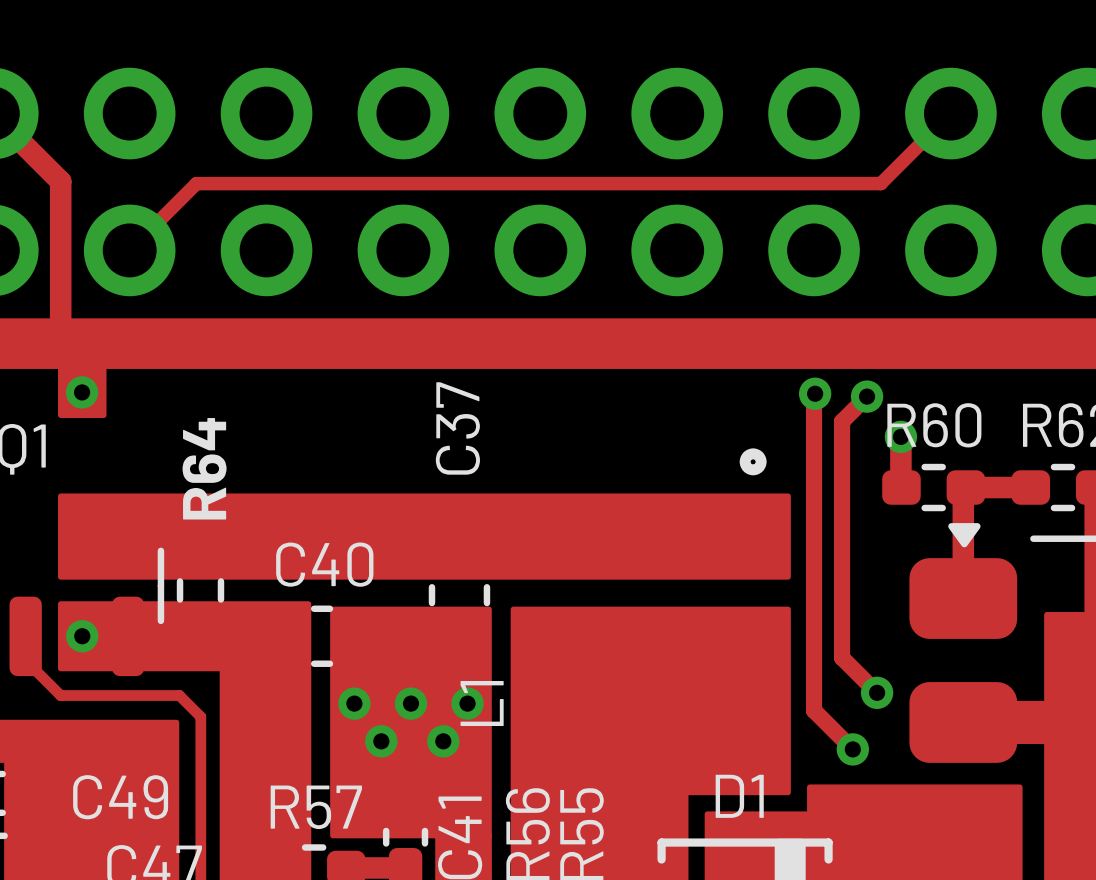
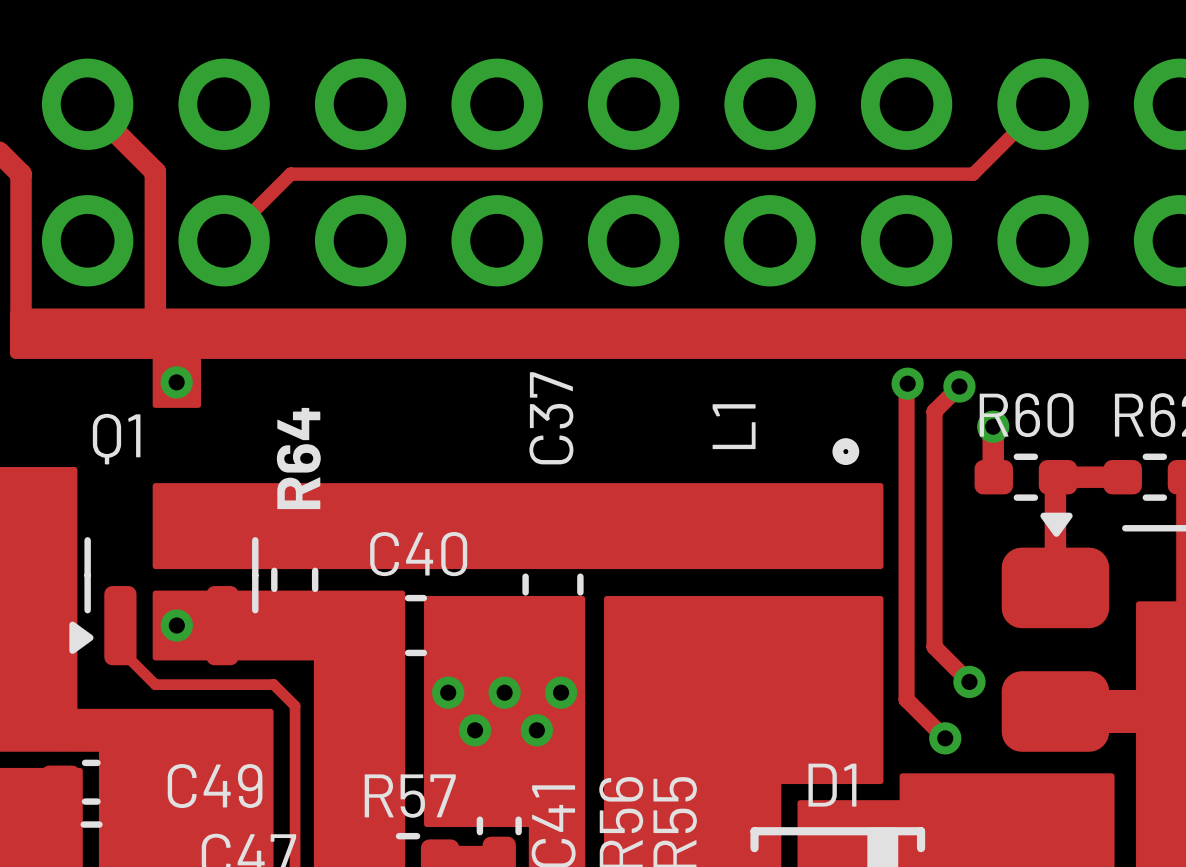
L1 name position: L1 (482, 703) -> L1 (734, 426)

